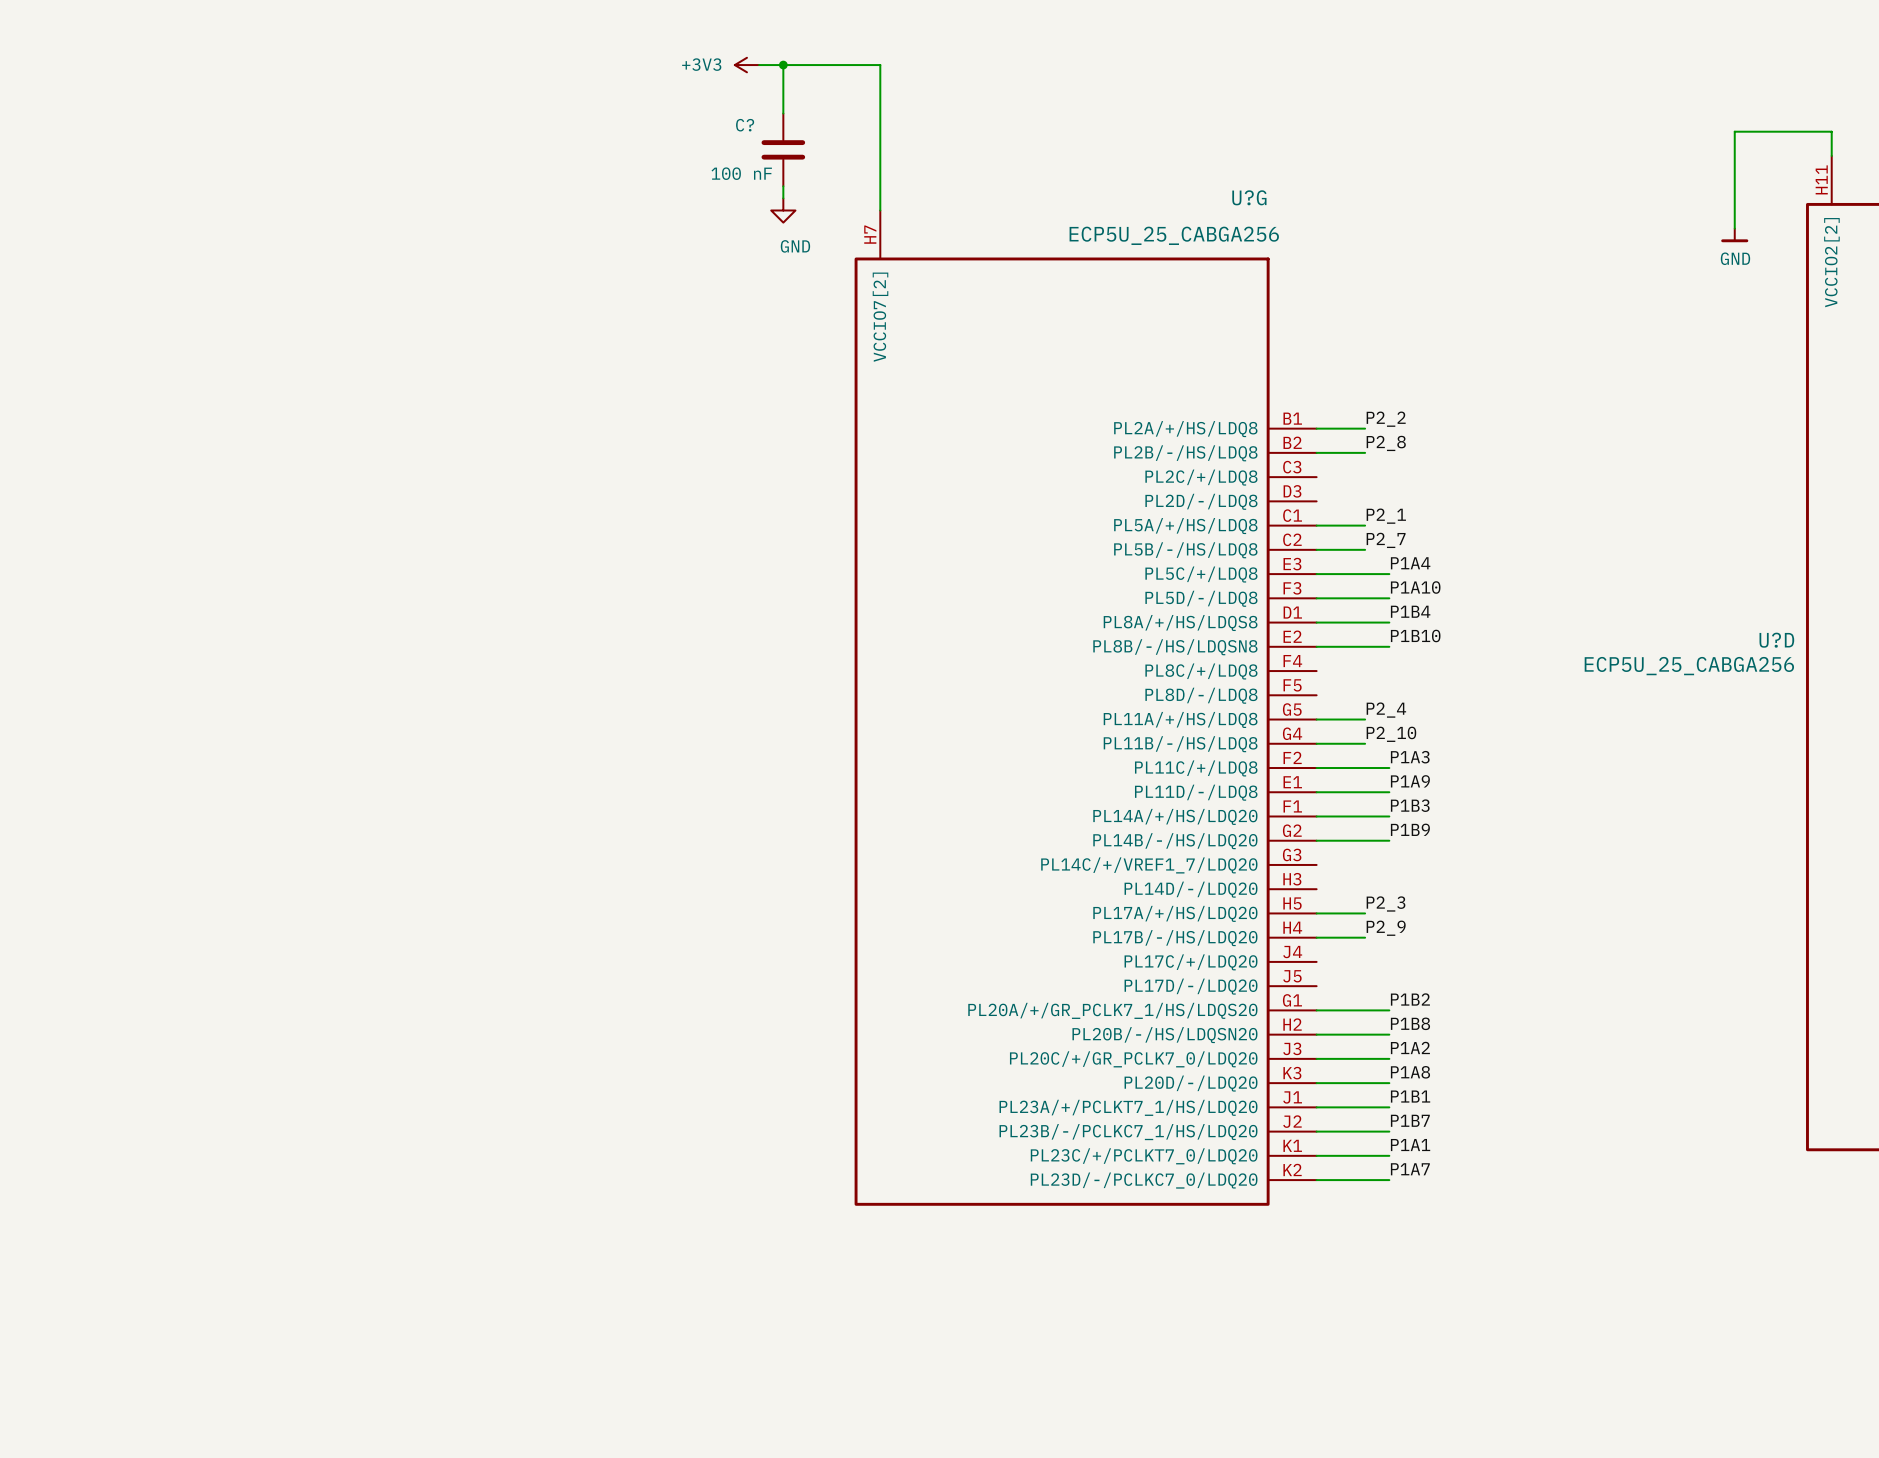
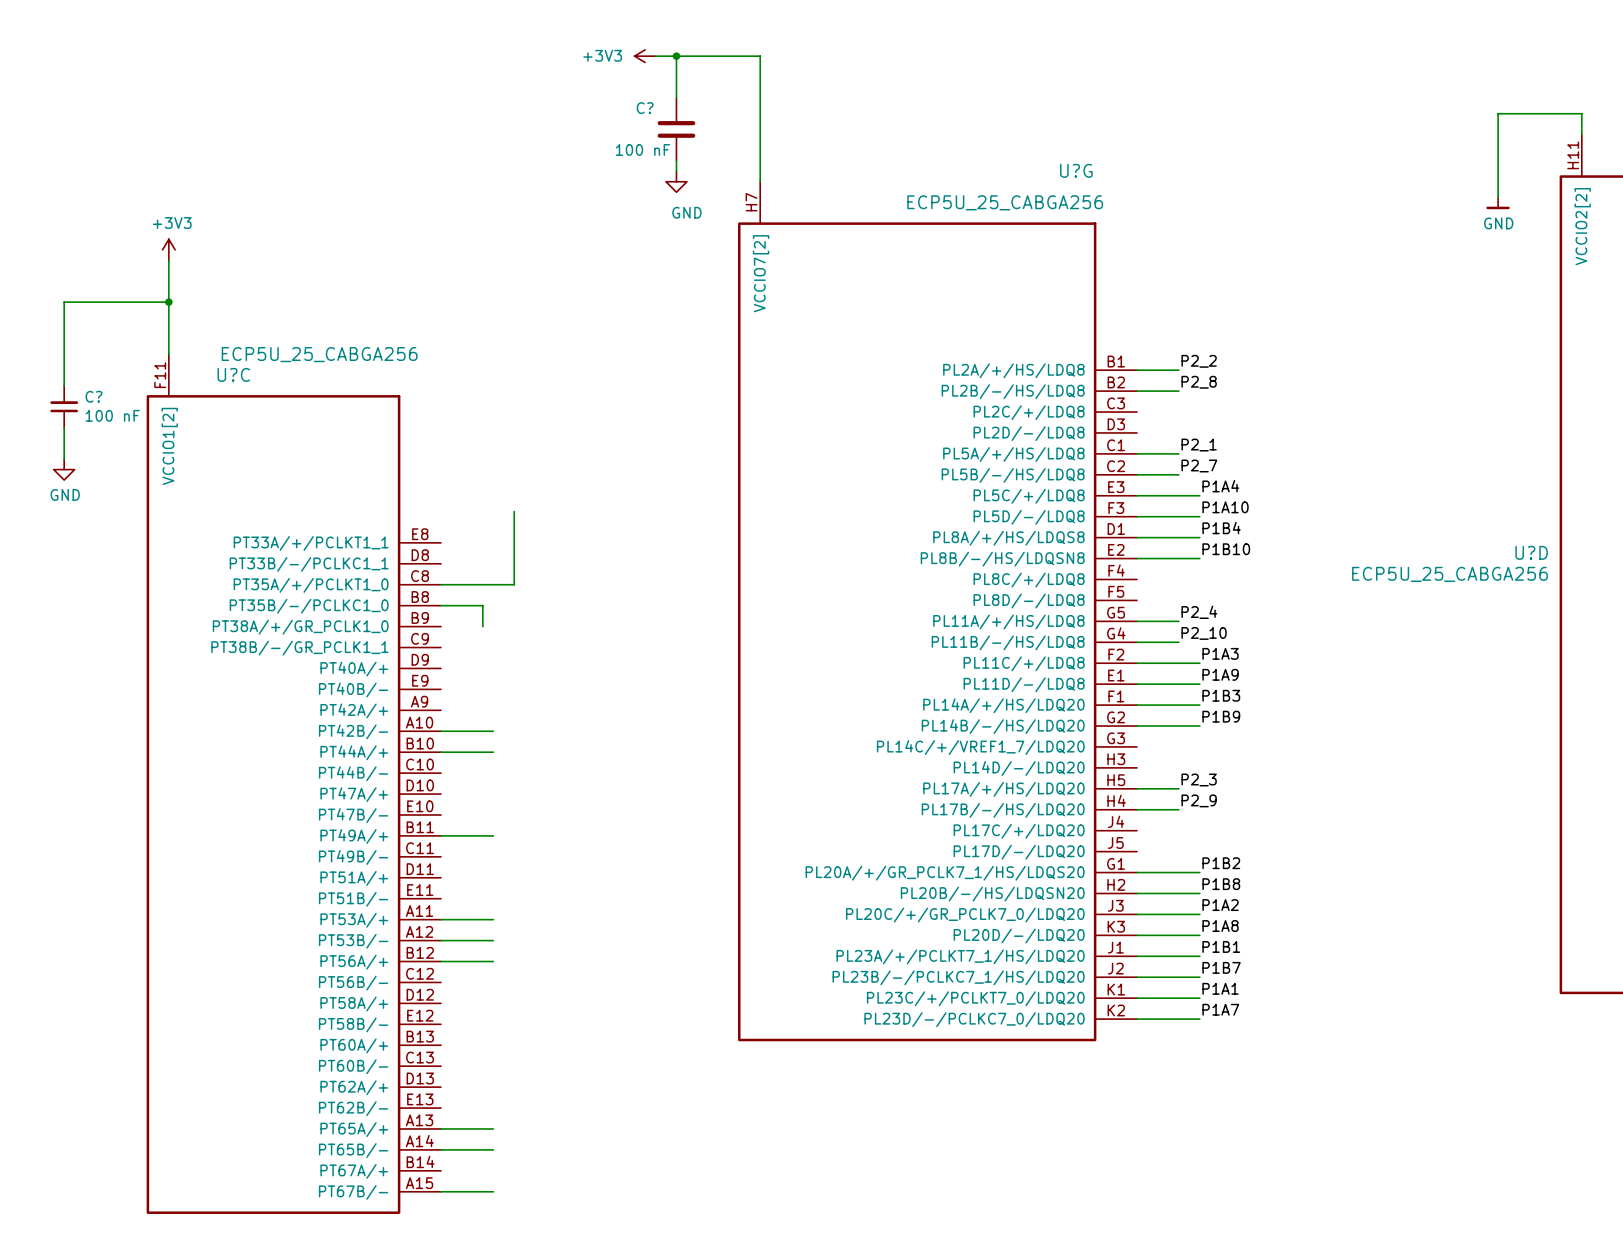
power symbol: none -> +3V3 (168, 249)
wire: none -> (168, 260) (168, 354)
wire: none -> (168, 302) (64, 302) (64, 385)
junction: none -> (168, 302)
C?: none -> 100 nF (64, 406)
wire: none -> (64, 427) (64, 459)
power symbol: none -> GND (64, 469)
wire: none -> (514, 511) (514, 584) (440, 584)
wire: none -> (440, 605) (482, 605) (482, 626)
wire: none -> (440, 731) (493, 731)
wire: none -> (440, 752) (493, 752)
U?C: none -> ECP5U_25_CABGA256 (293, 784)
wire: none -> (440, 835) (493, 835)
wire: none -> (440, 919) (493, 919)
wire: none -> (440, 940) (493, 940)
wire: none -> (440, 961) (493, 961)
wire: none -> (440, 1128) (493, 1128)
wire: none -> (440, 1149) (493, 1149)
wire: none -> (440, 1191) (493, 1191)

